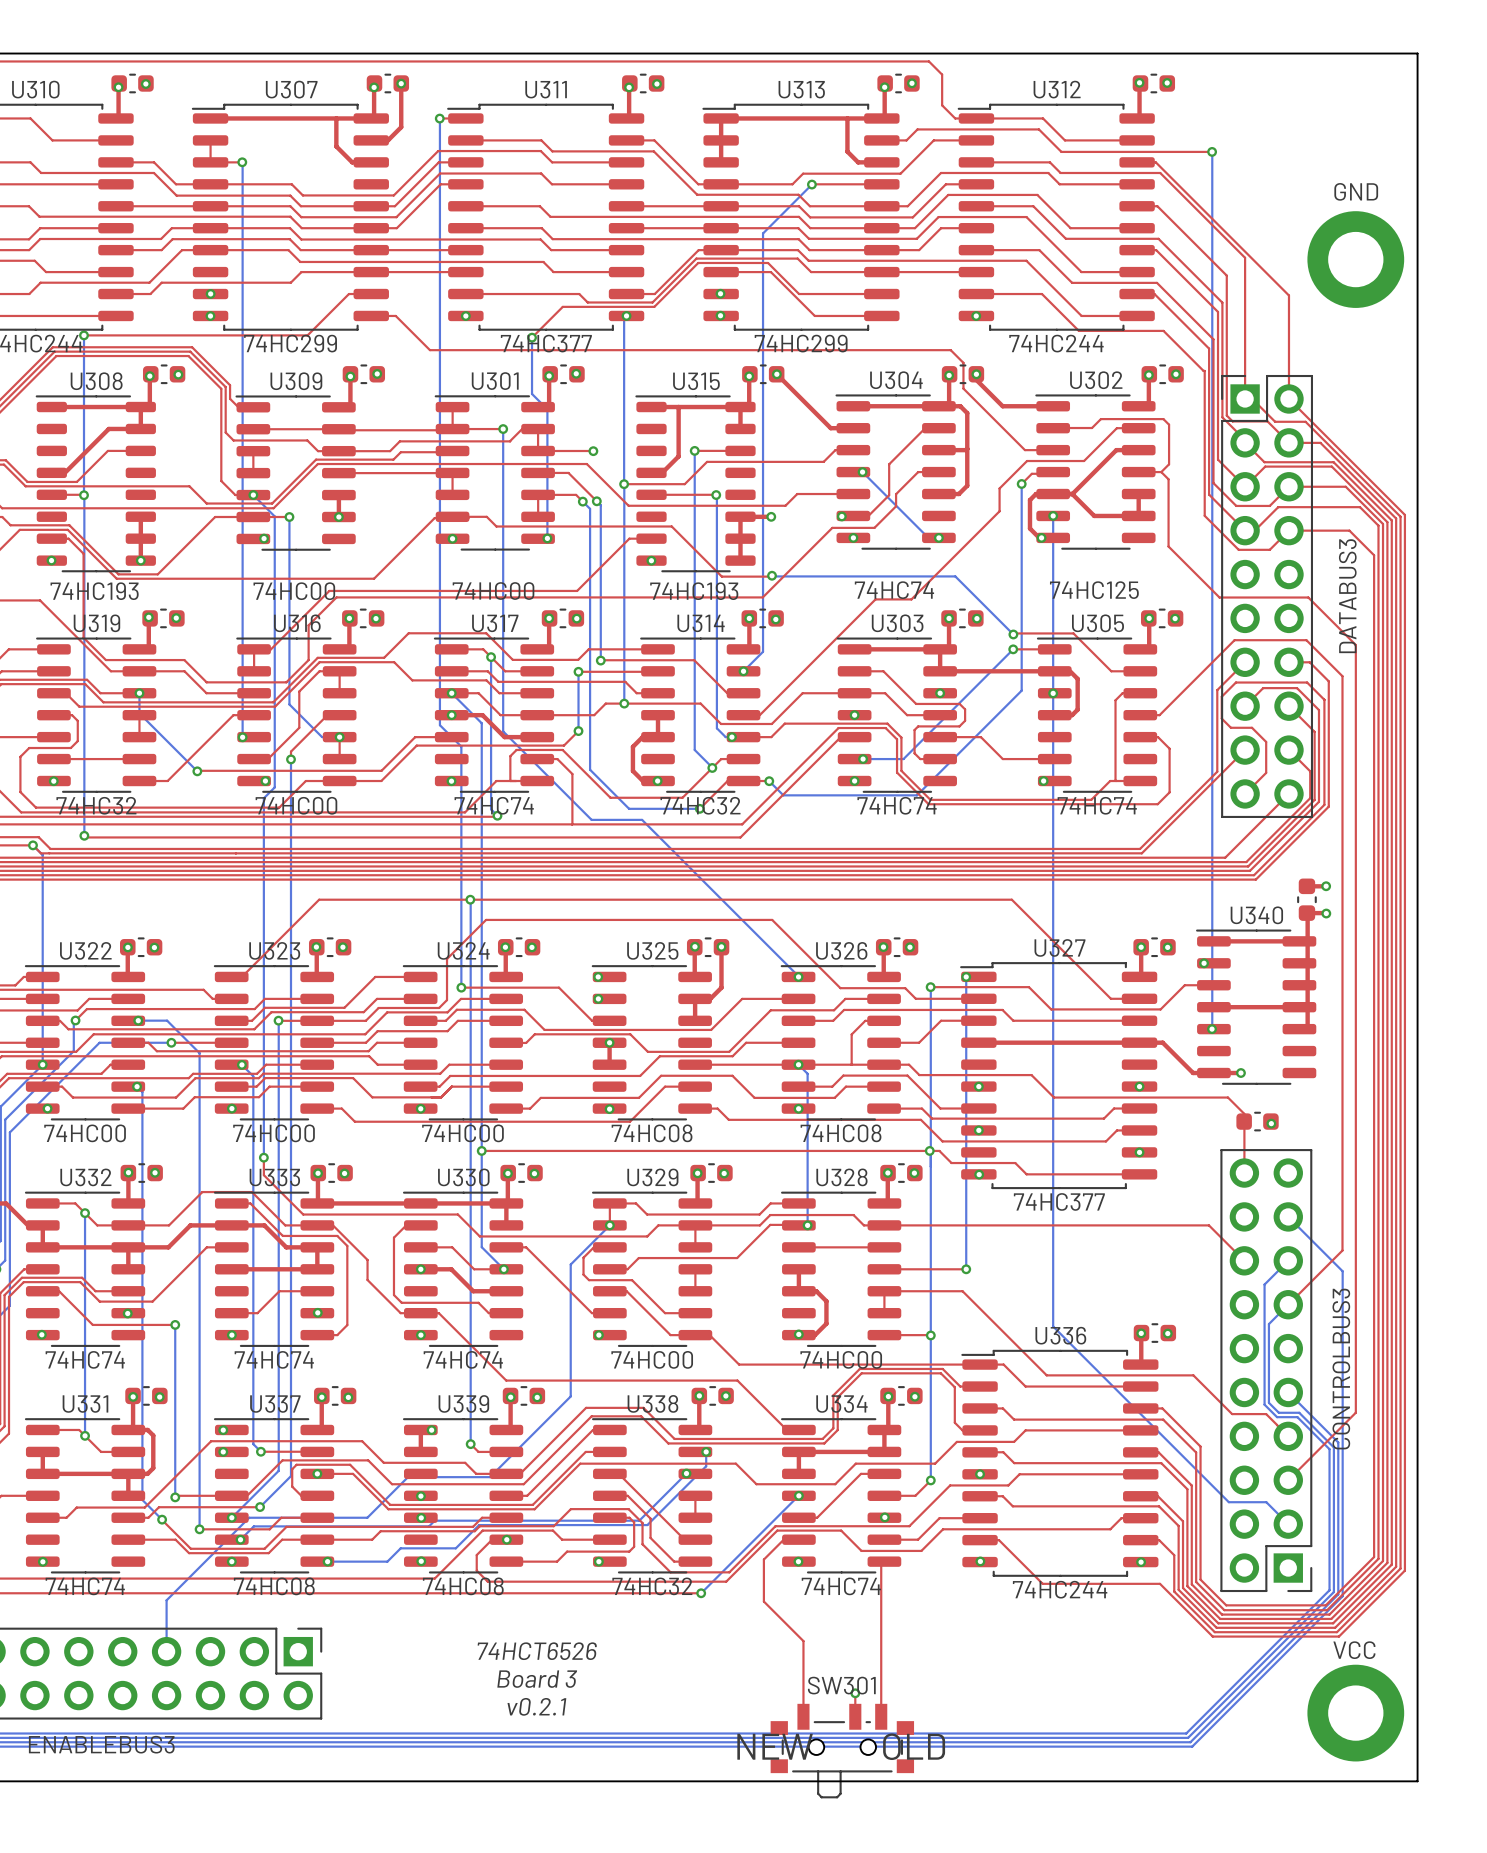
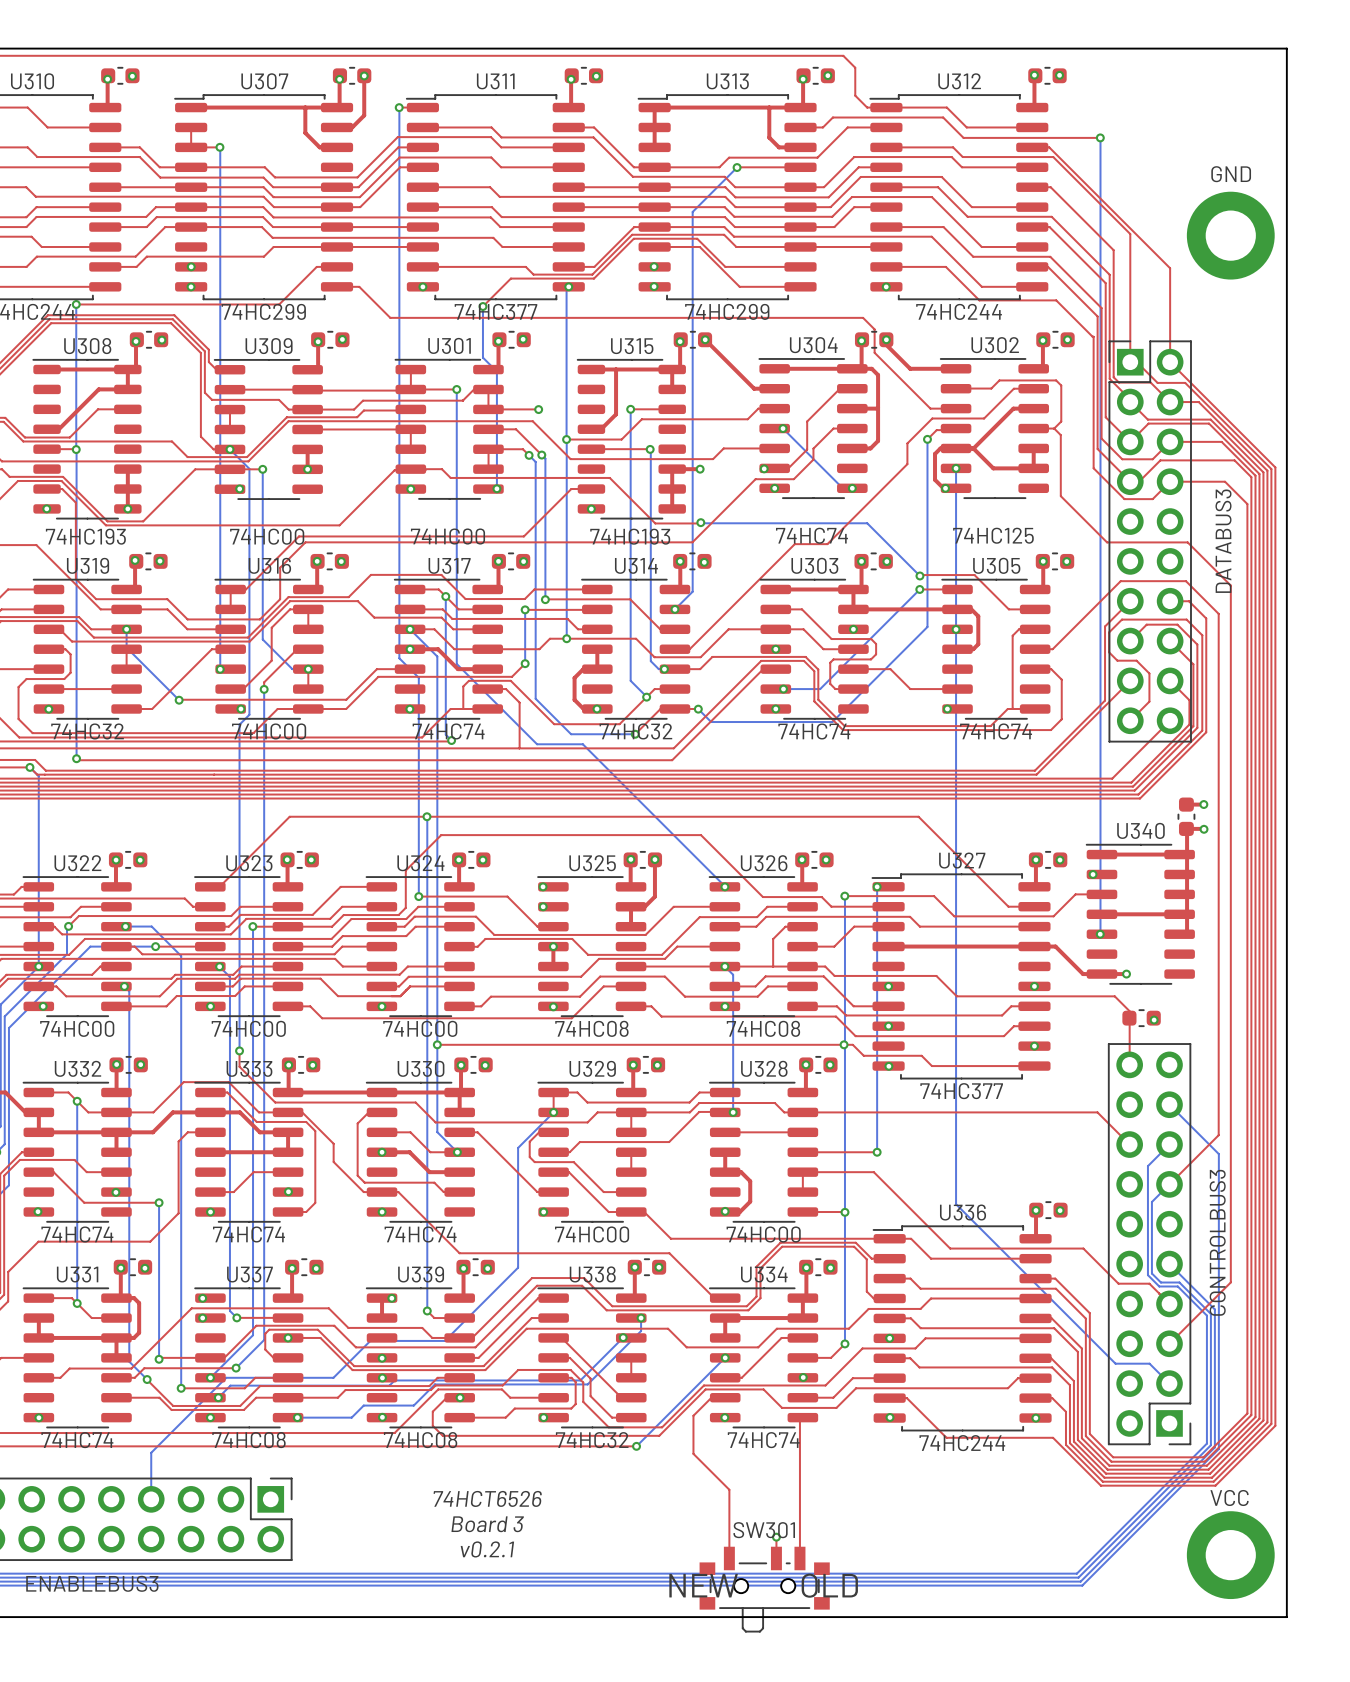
top track: (196, 1257) (152, 1301) (99, 1301) (80, 1282) (23, 1282) (9, 1296) (9, 1401) -> (178, 1141) (178, 1213) (150, 1241) (38, 1241) (8, 1271)

